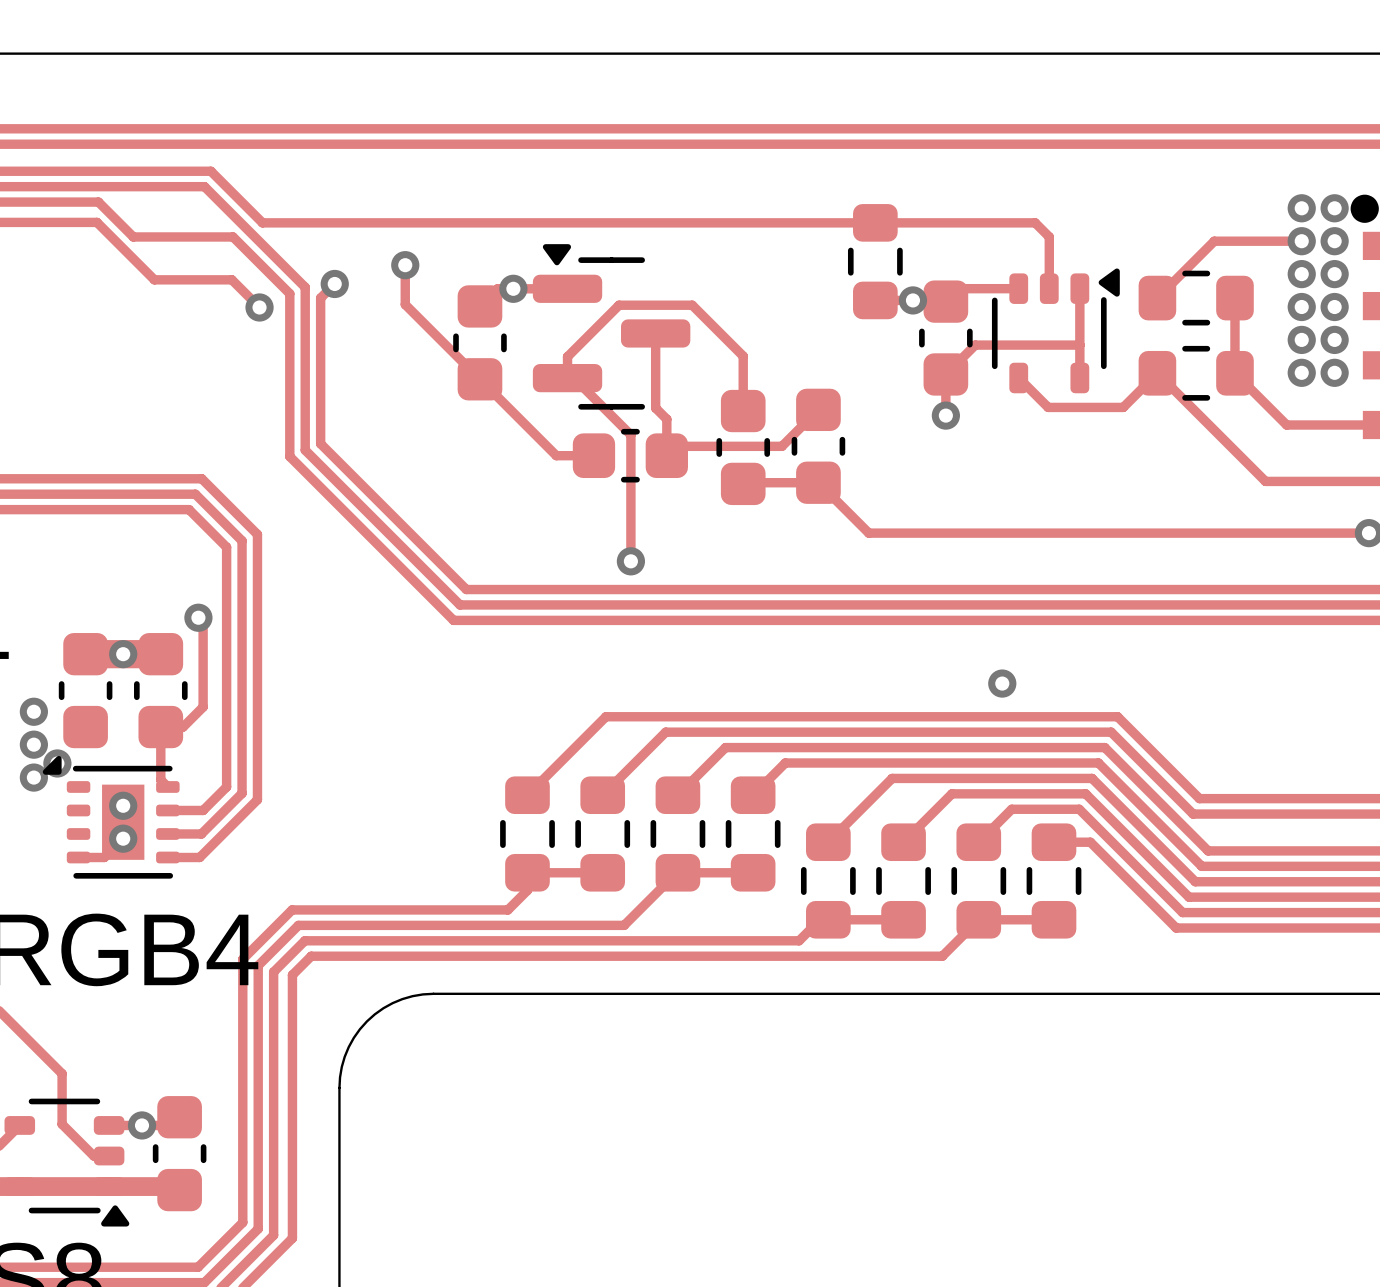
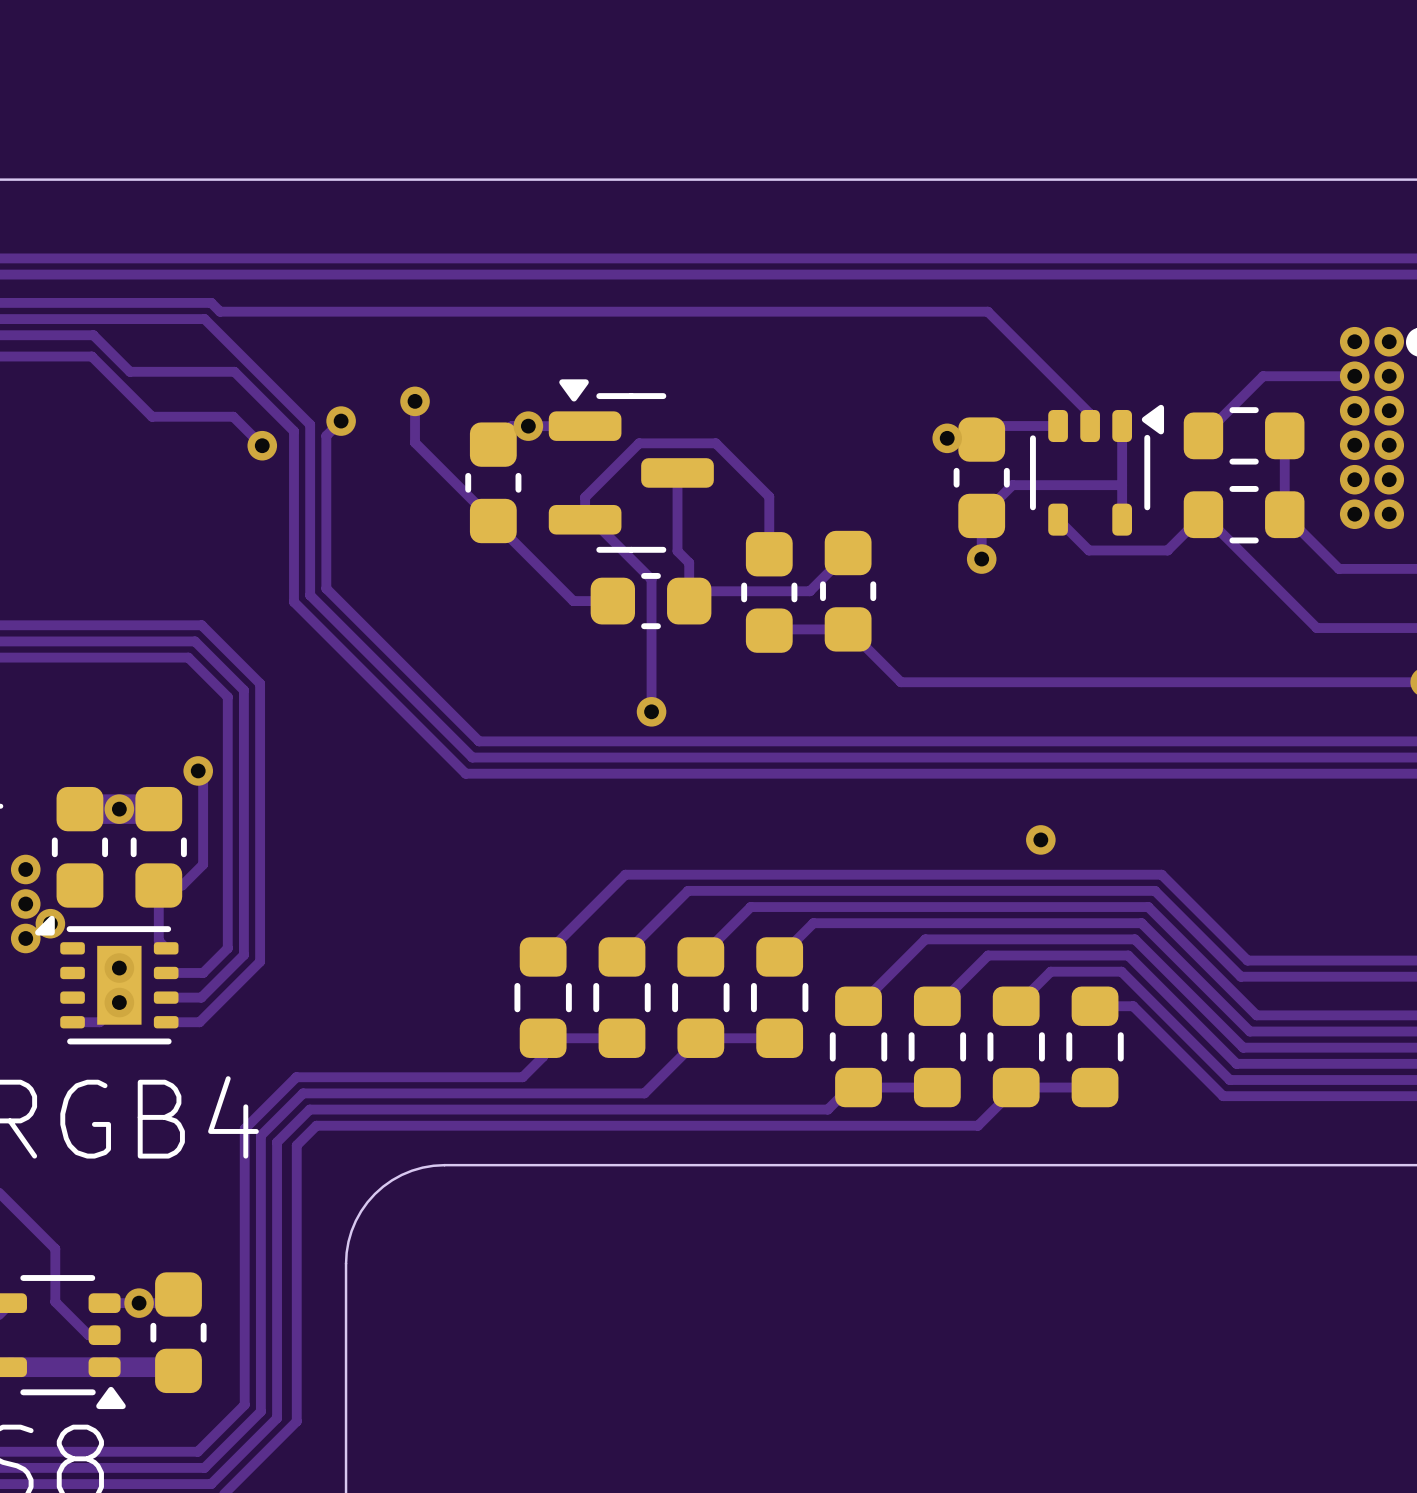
track: (219, 179) (262, 222) (1035, 222) (1049, 236) (1049, 277) -> (220, 311) (987, 311) (1090, 413)
part: (875, 261) -> none

